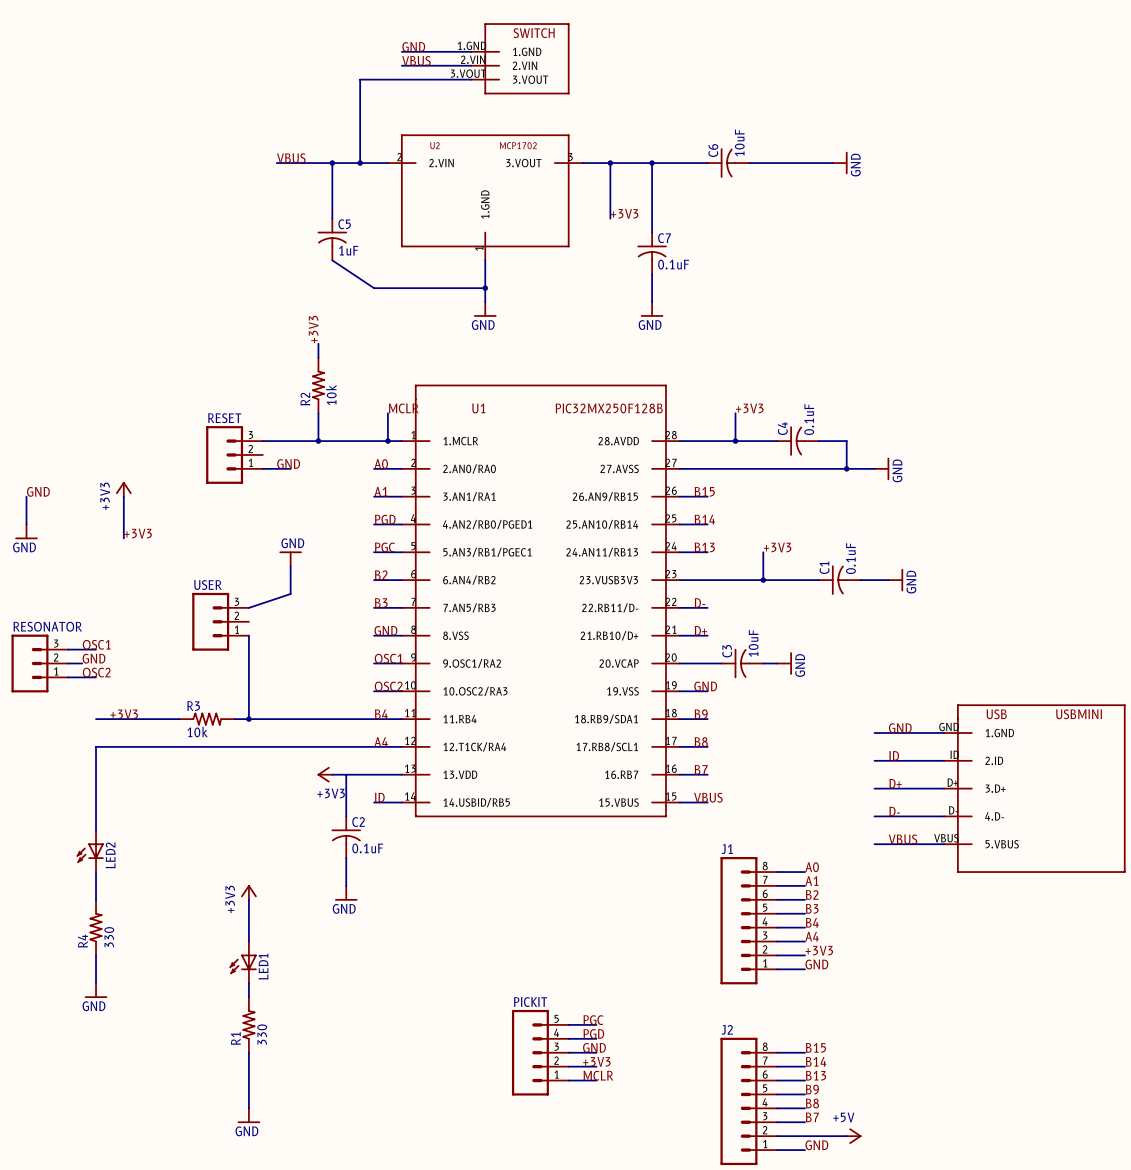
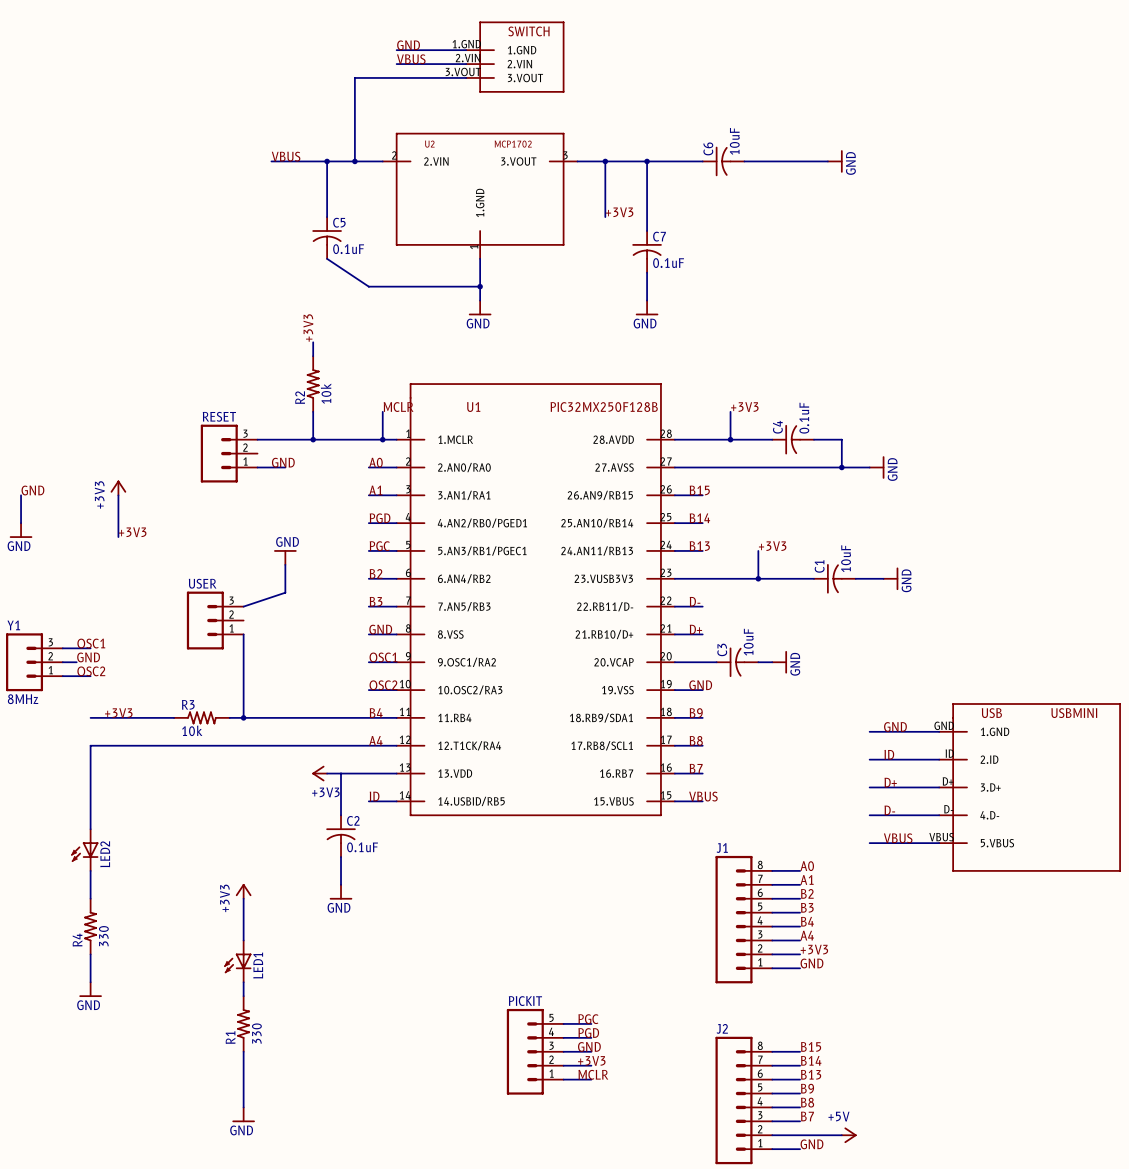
C5 value: 1uF (348, 250) -> 0.1uF (348, 249)
C1 value: 0.1uF (850, 558) -> 10uF (846, 558)
RESONATOR name: RESONATOR (47, 626) -> Y1 (13, 625)
RESONATOR value: none -> 8MHz (23, 699)

